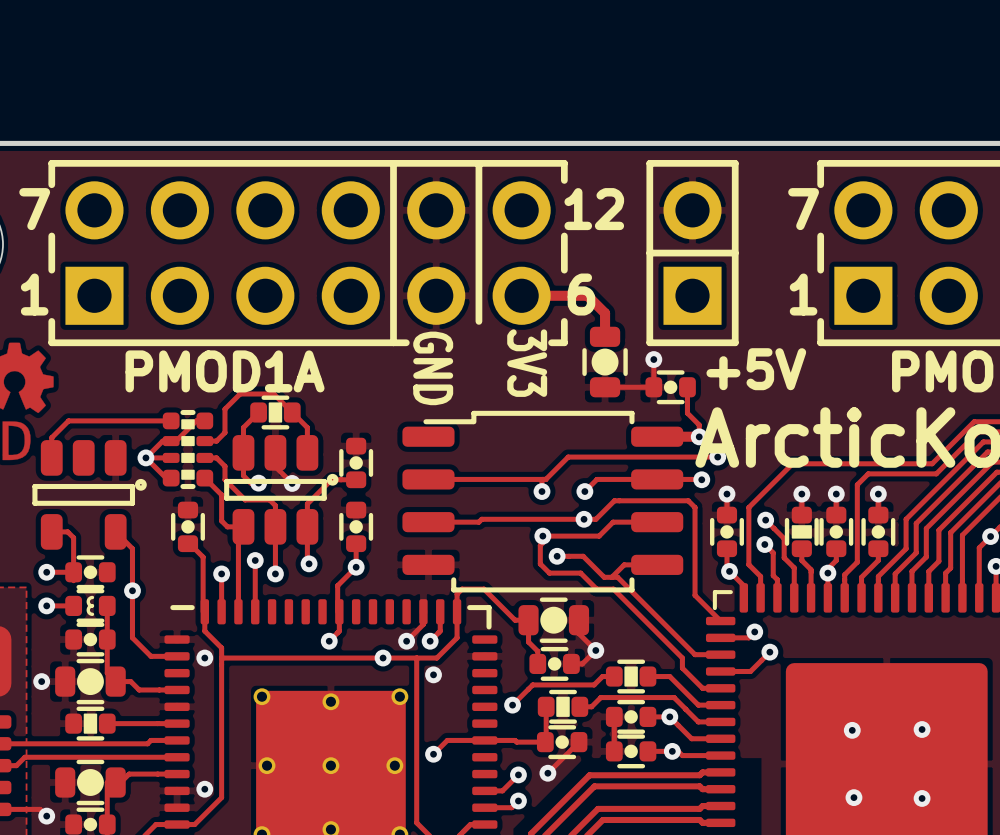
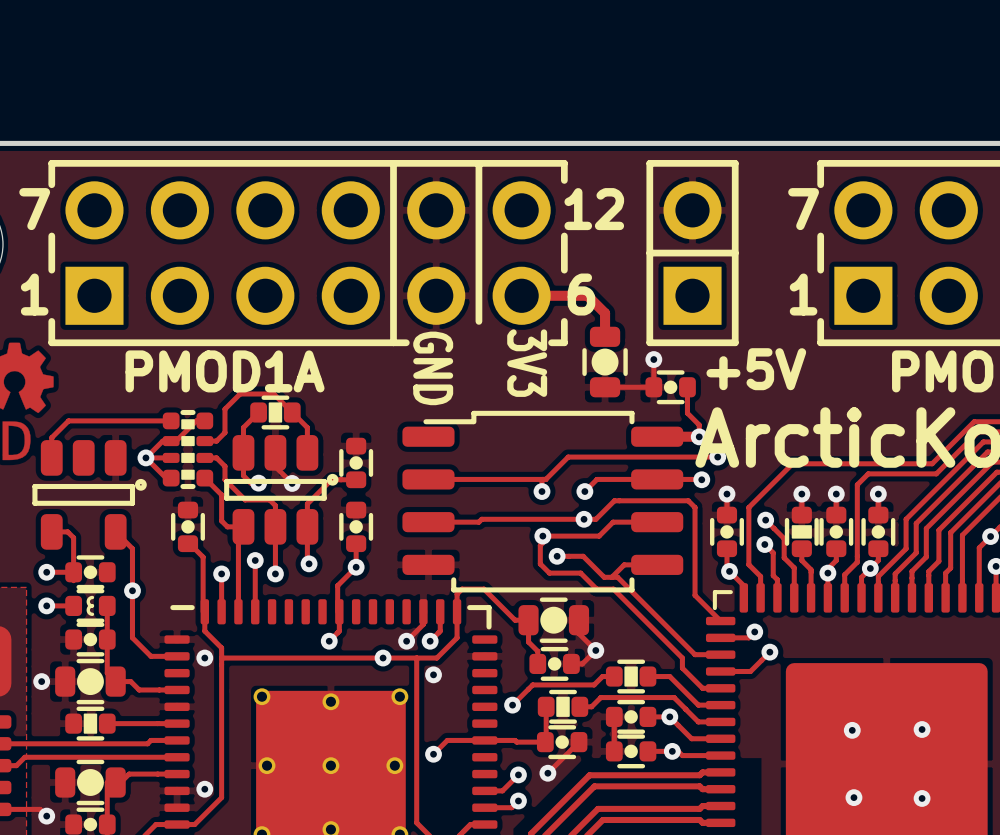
via: none -> (870, 568)

